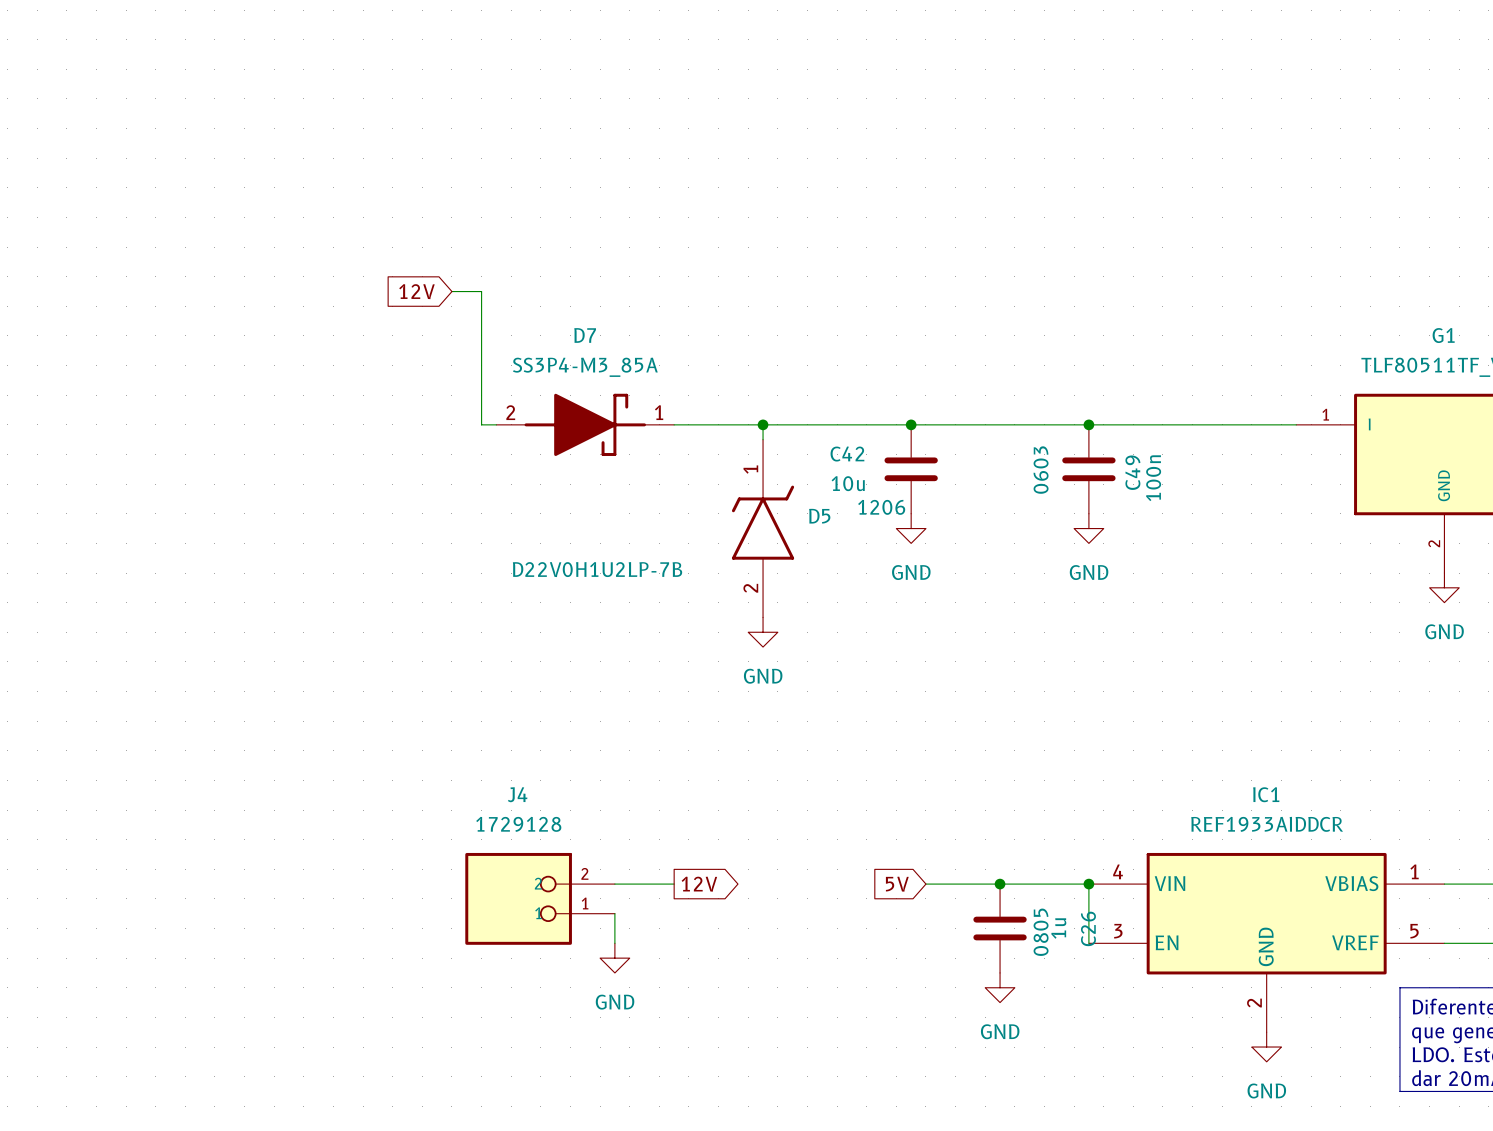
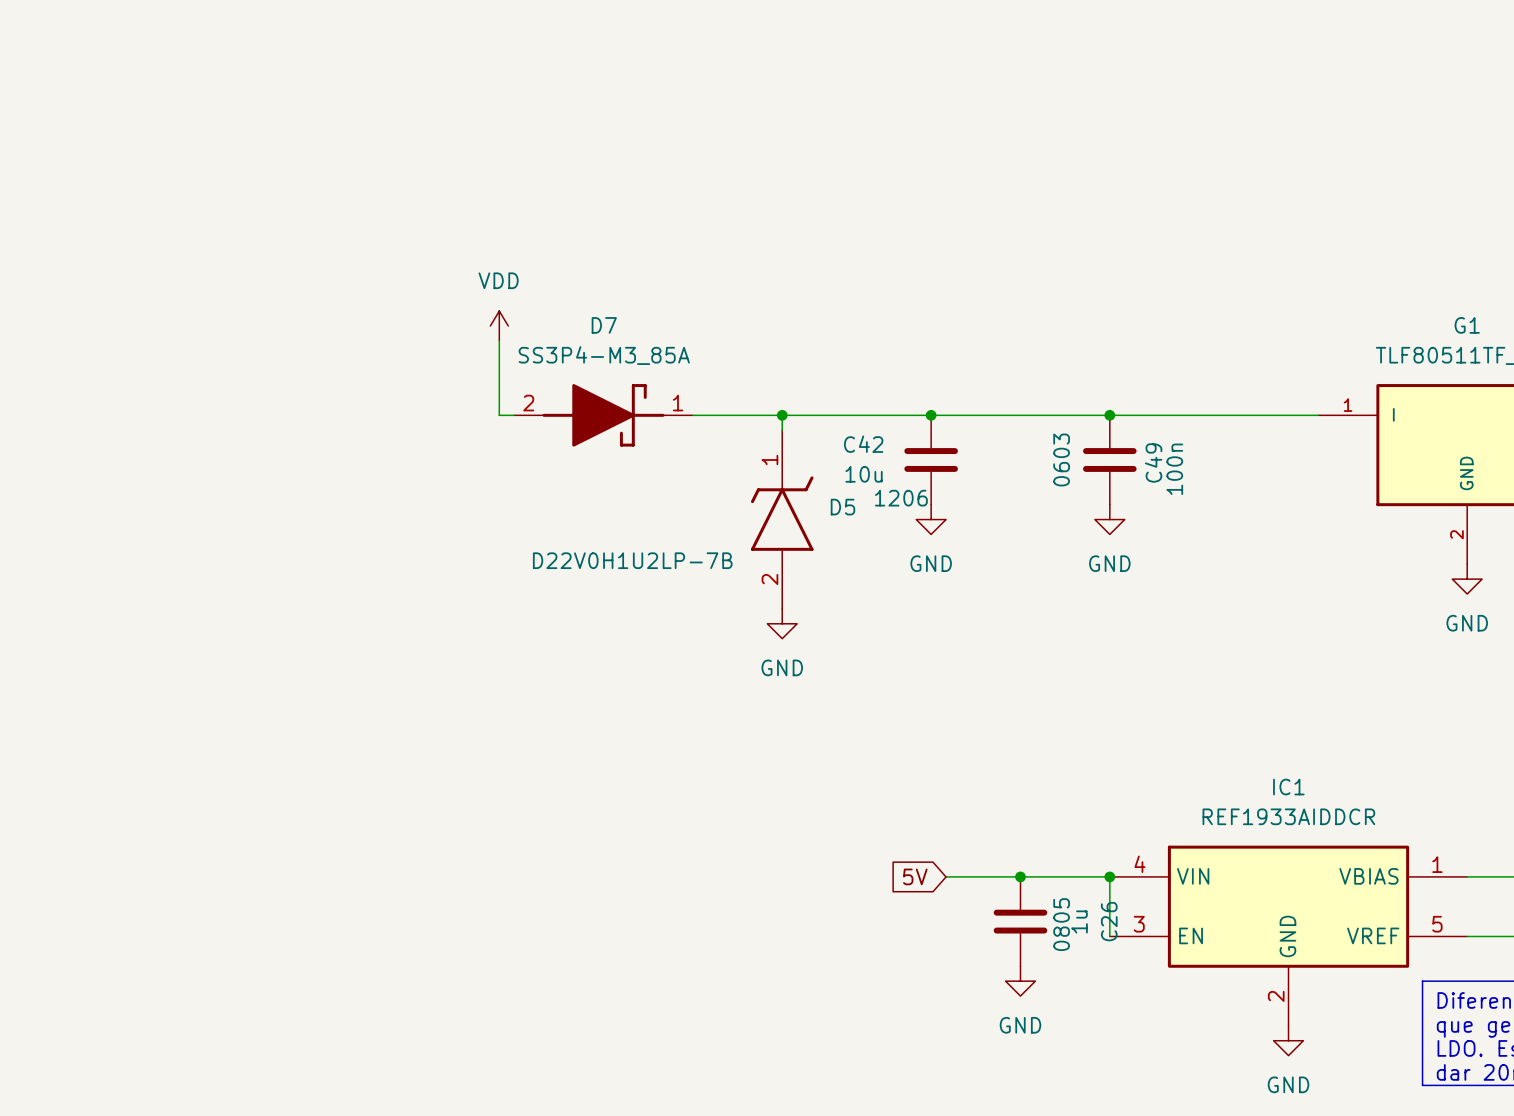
global label: 12V (416, 291) -> none
wire: (451, 291) (481, 291) (481, 350) -> none
power symbol: none -> VDD (499, 325)
wire: (614, 884) (674, 884) -> none
global label: 12V (699, 884) -> none
J4: 1729128 (540, 898) -> none
wire: (614, 913) (614, 943) -> none
power symbol: GND (614, 958) -> none

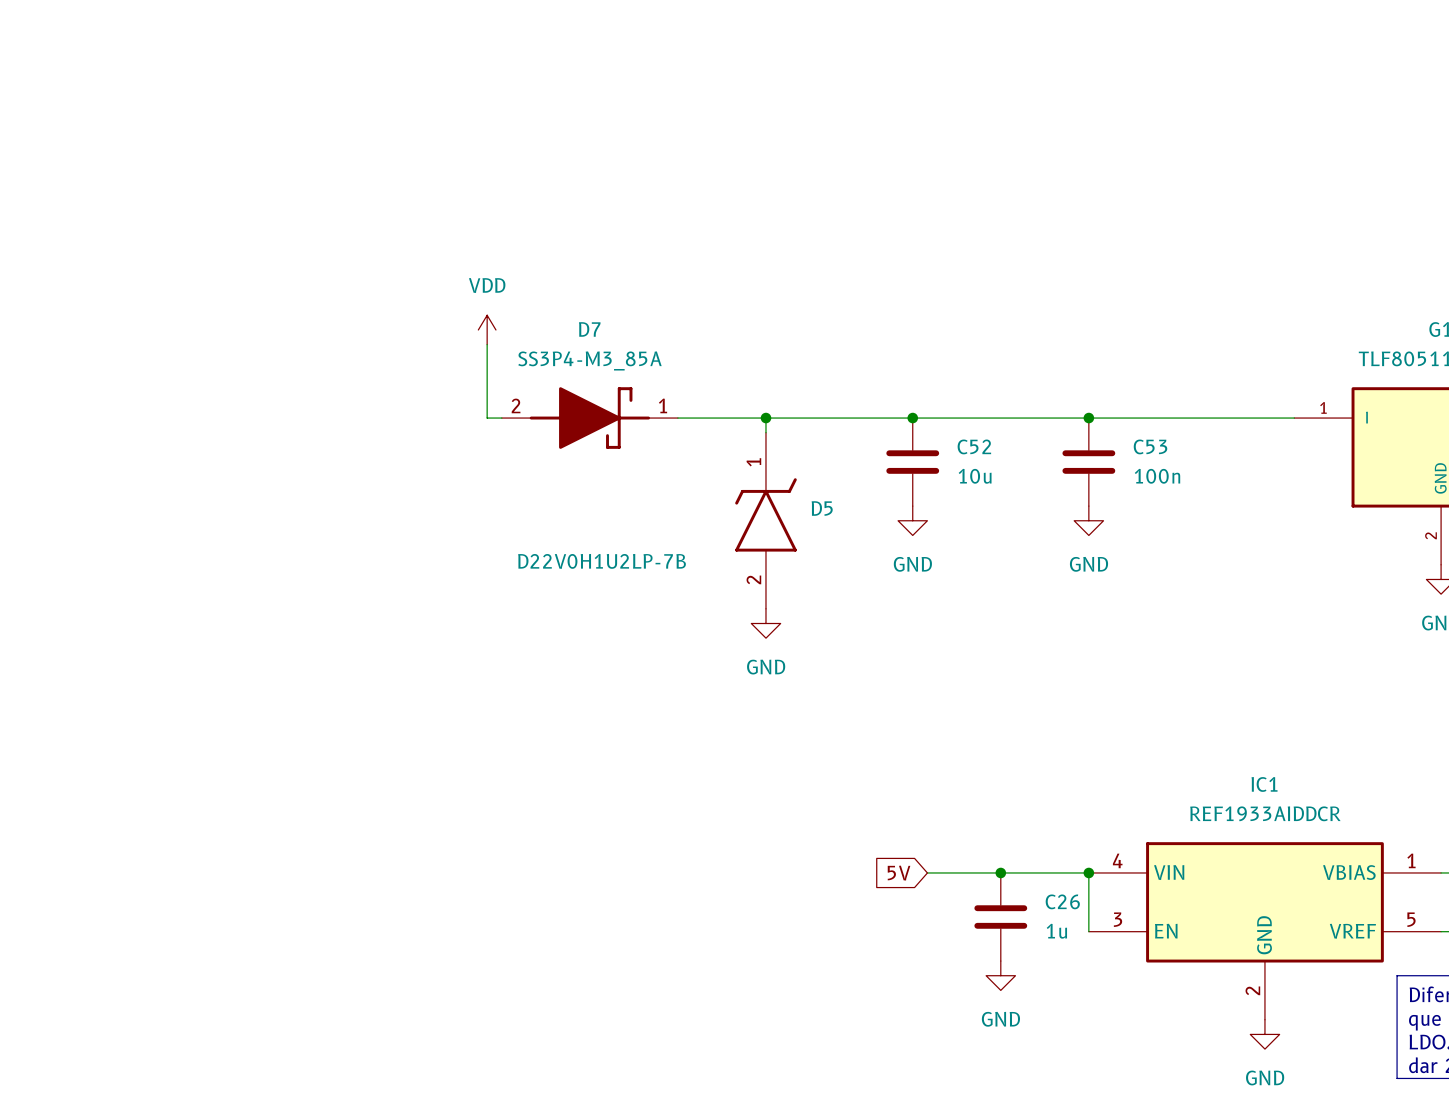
C42 name: C42 (863, 444) -> C52 (974, 446)
C49 text: 0603 (1061, 459) -> none
C49 name: C49 (1153, 462) -> C53 (1150, 446)
C49 value rotation: 0° (1174, 469) -> 90° clockwise (1157, 476)
C42 value position: 10u (864, 474) -> 10u (975, 476)
C42 text: 1206 (901, 498) -> none
C26 value rotation: 0° (1079, 921) -> 90° clockwise (1056, 931)
C26 name rotation: 0° (1109, 921) -> 90° clockwise (1062, 901)
C26 text: 0805 (1061, 924) -> none

